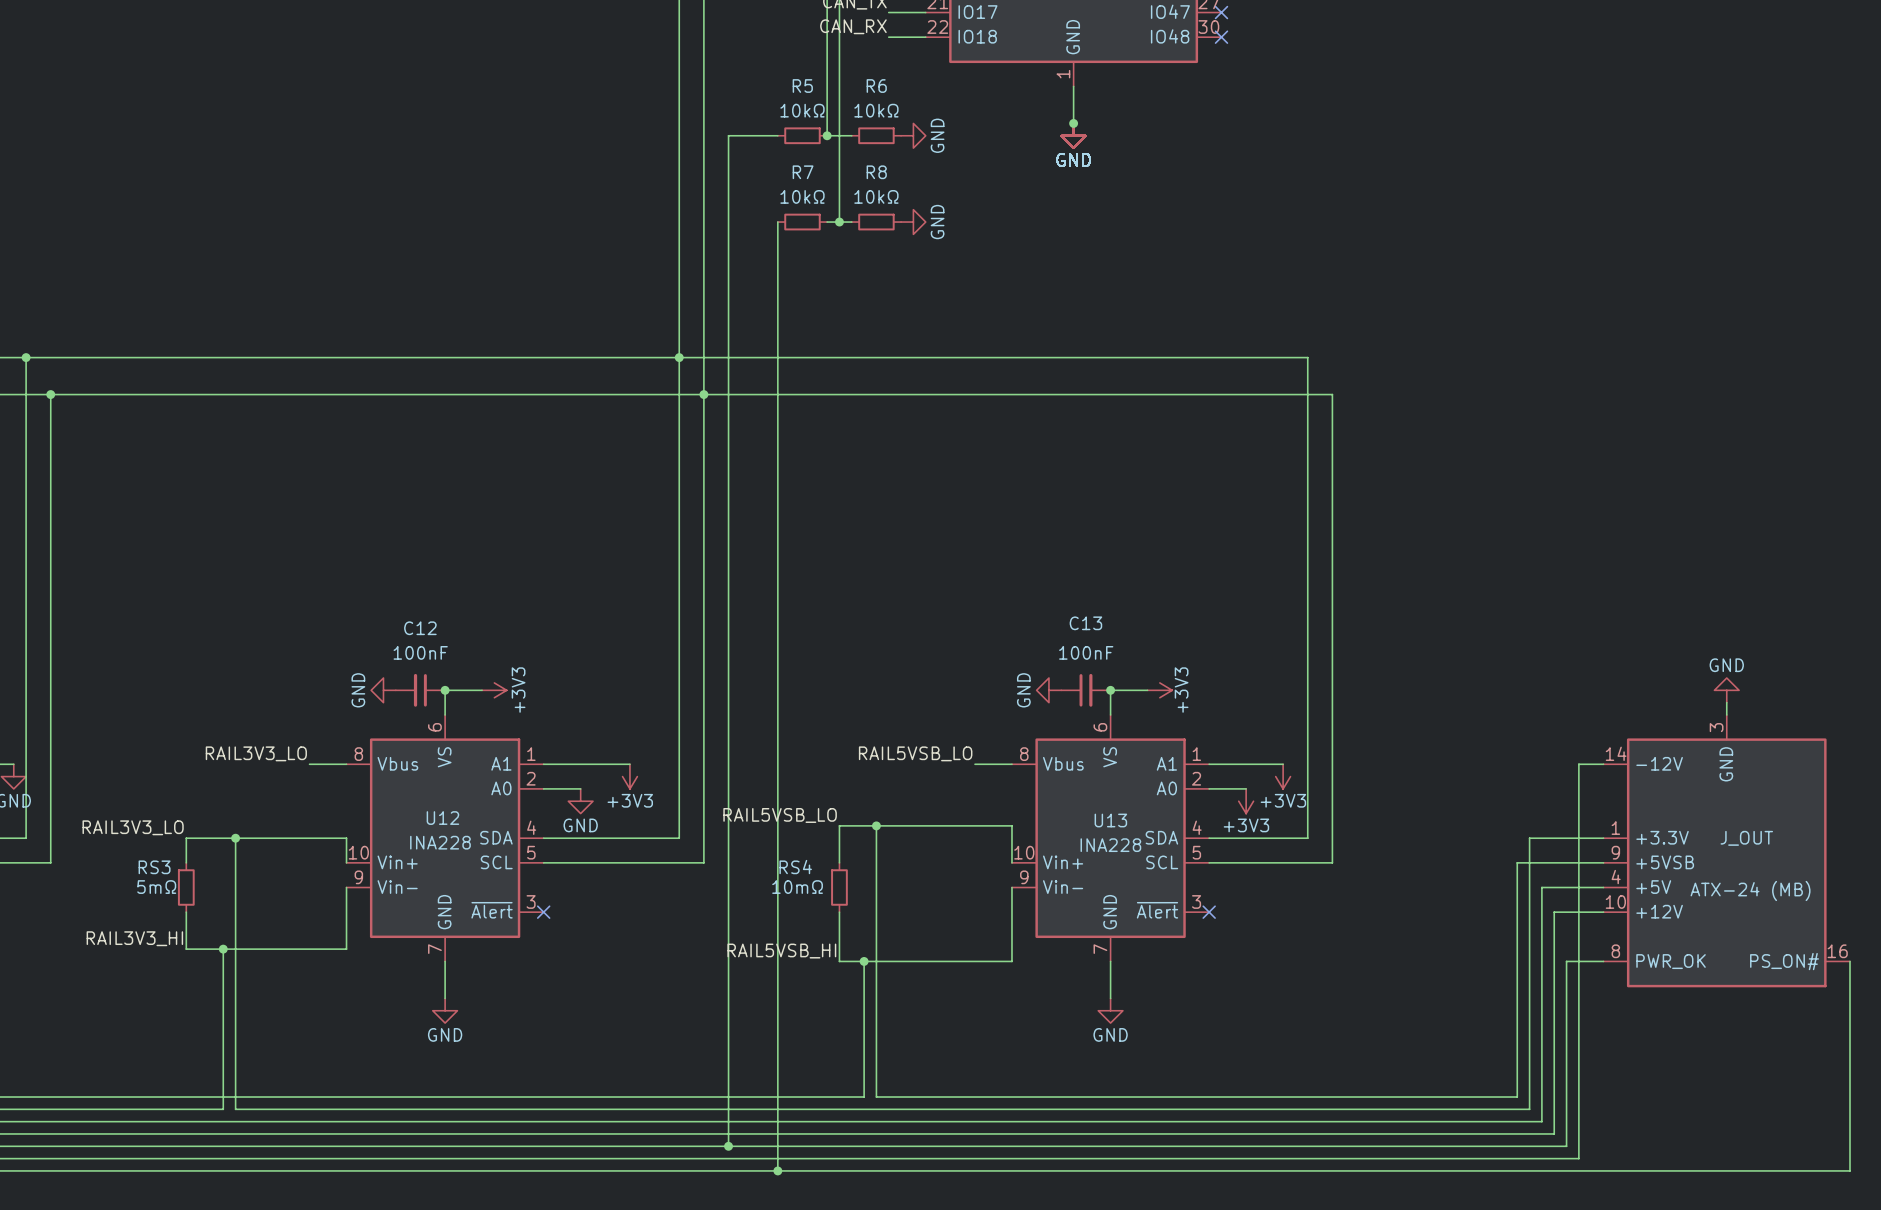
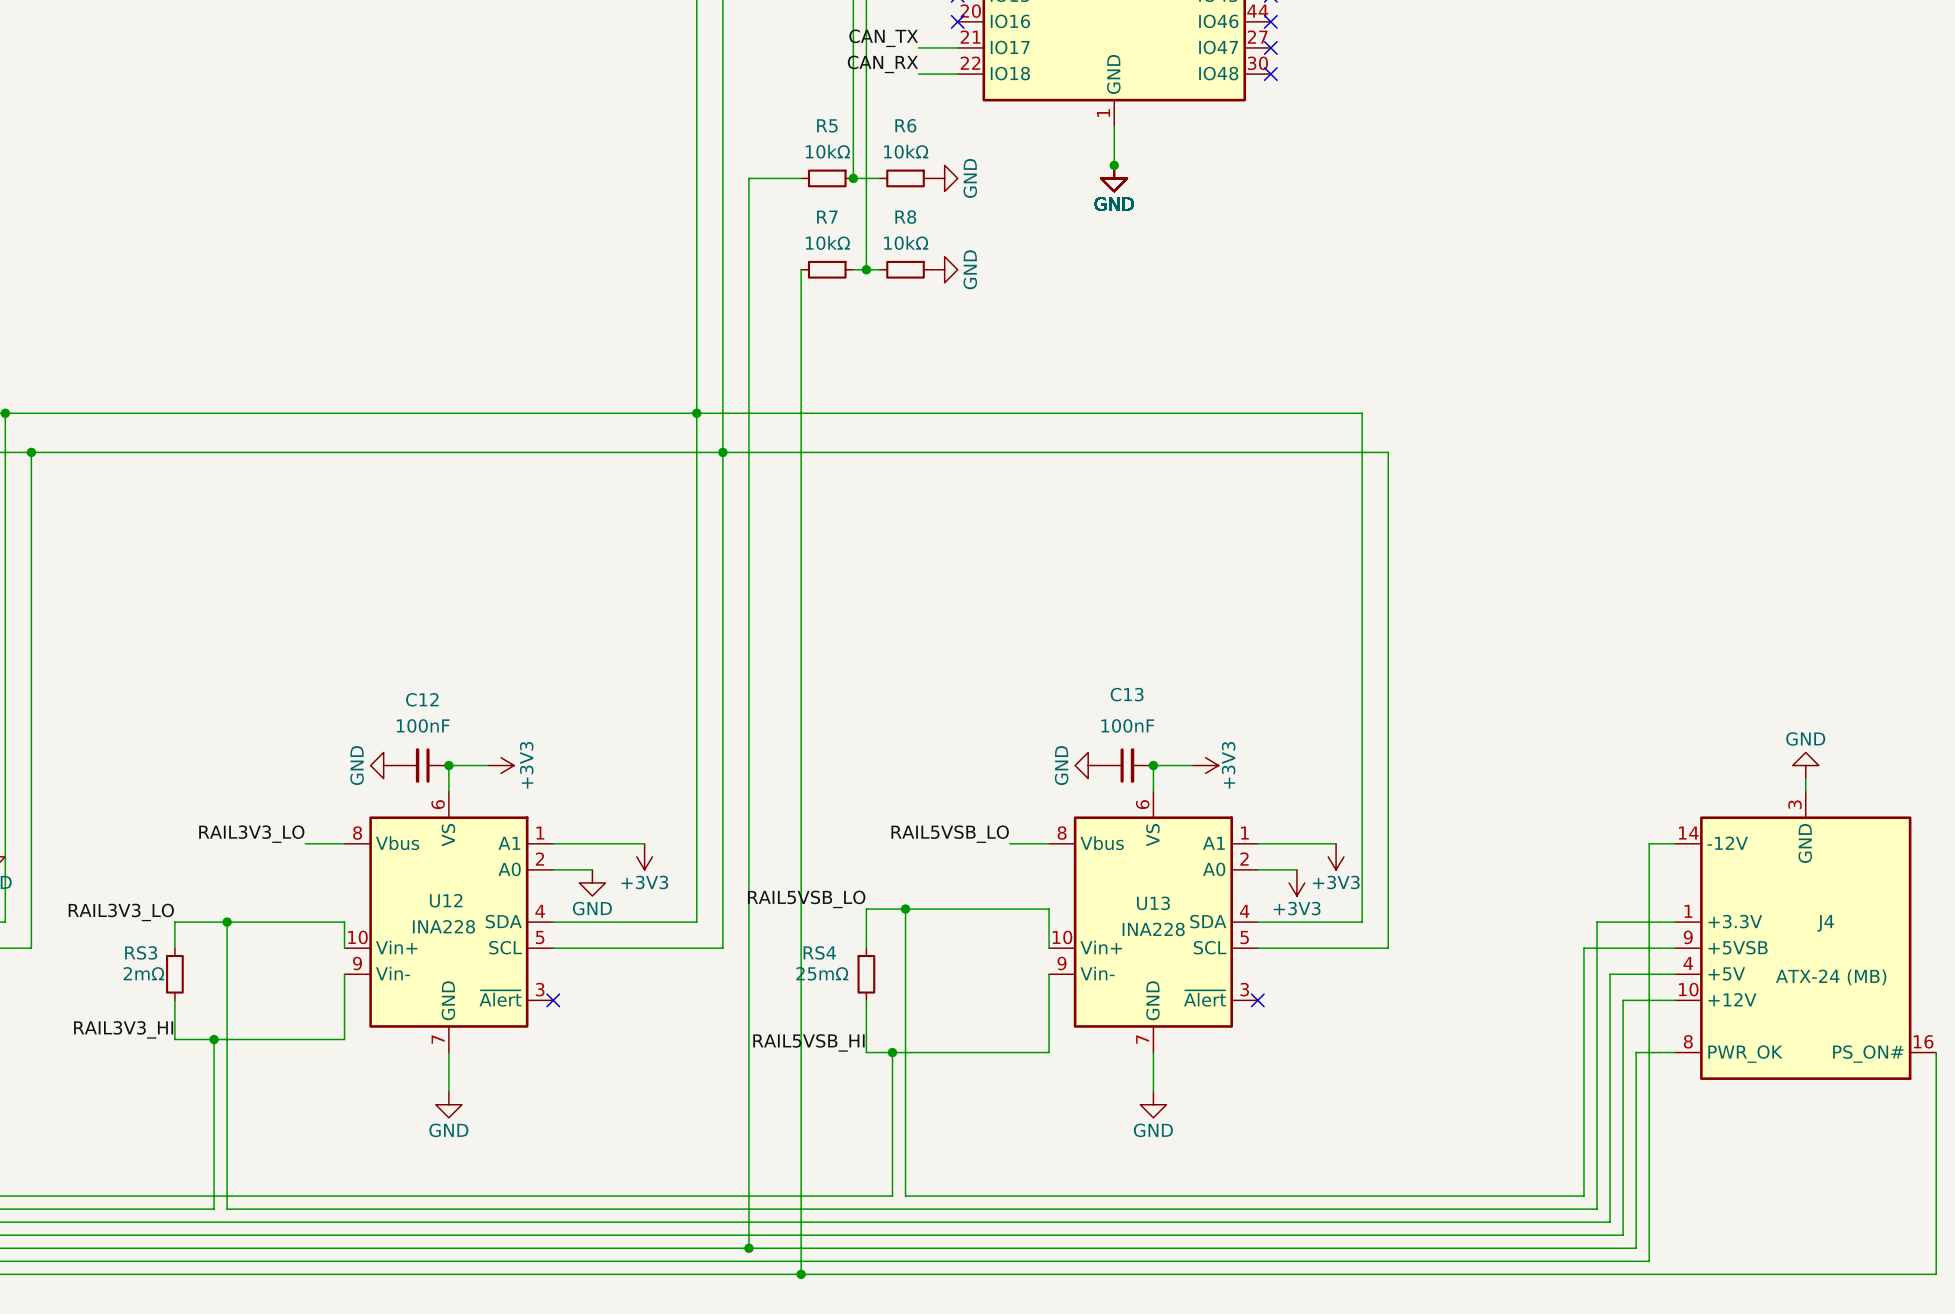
J_OUT name: J_OUT (1746, 838) -> J4 (1825, 923)
RS3 value: 5mΩ (156, 887) -> 2mΩ (143, 973)
RS4 value: 10mΩ (797, 887) -> 25mΩ (822, 973)

